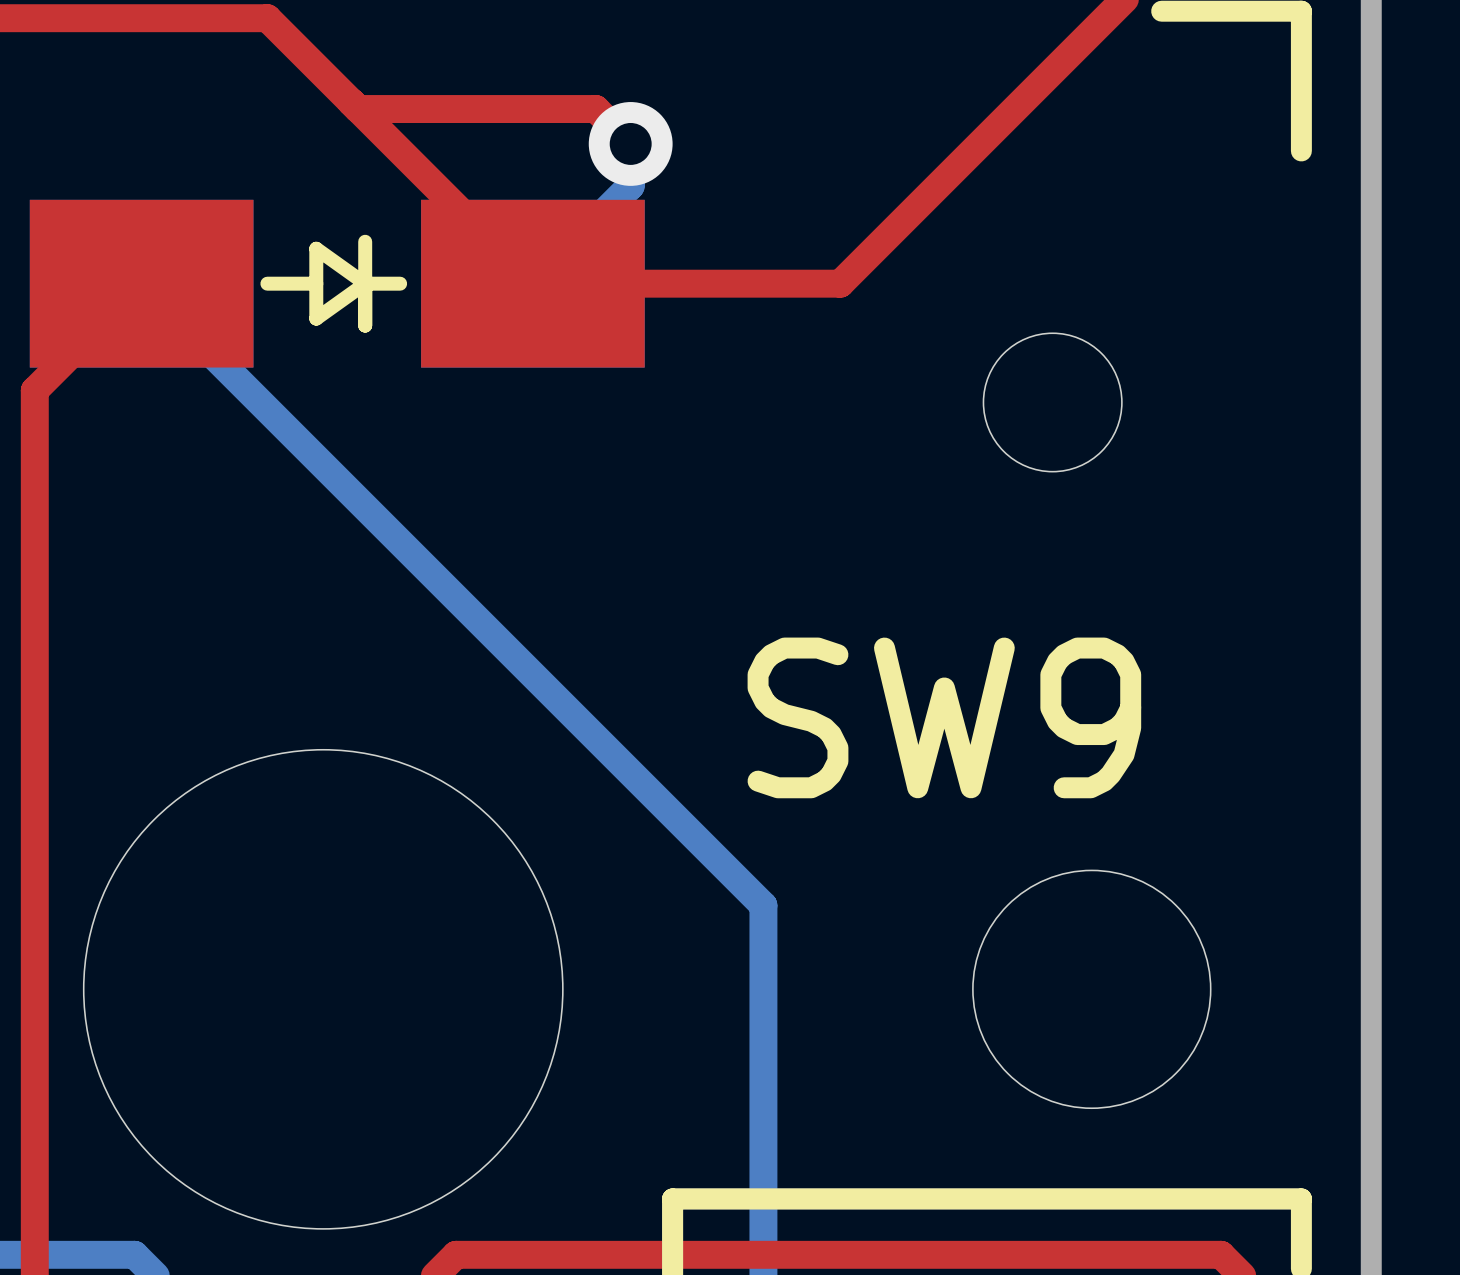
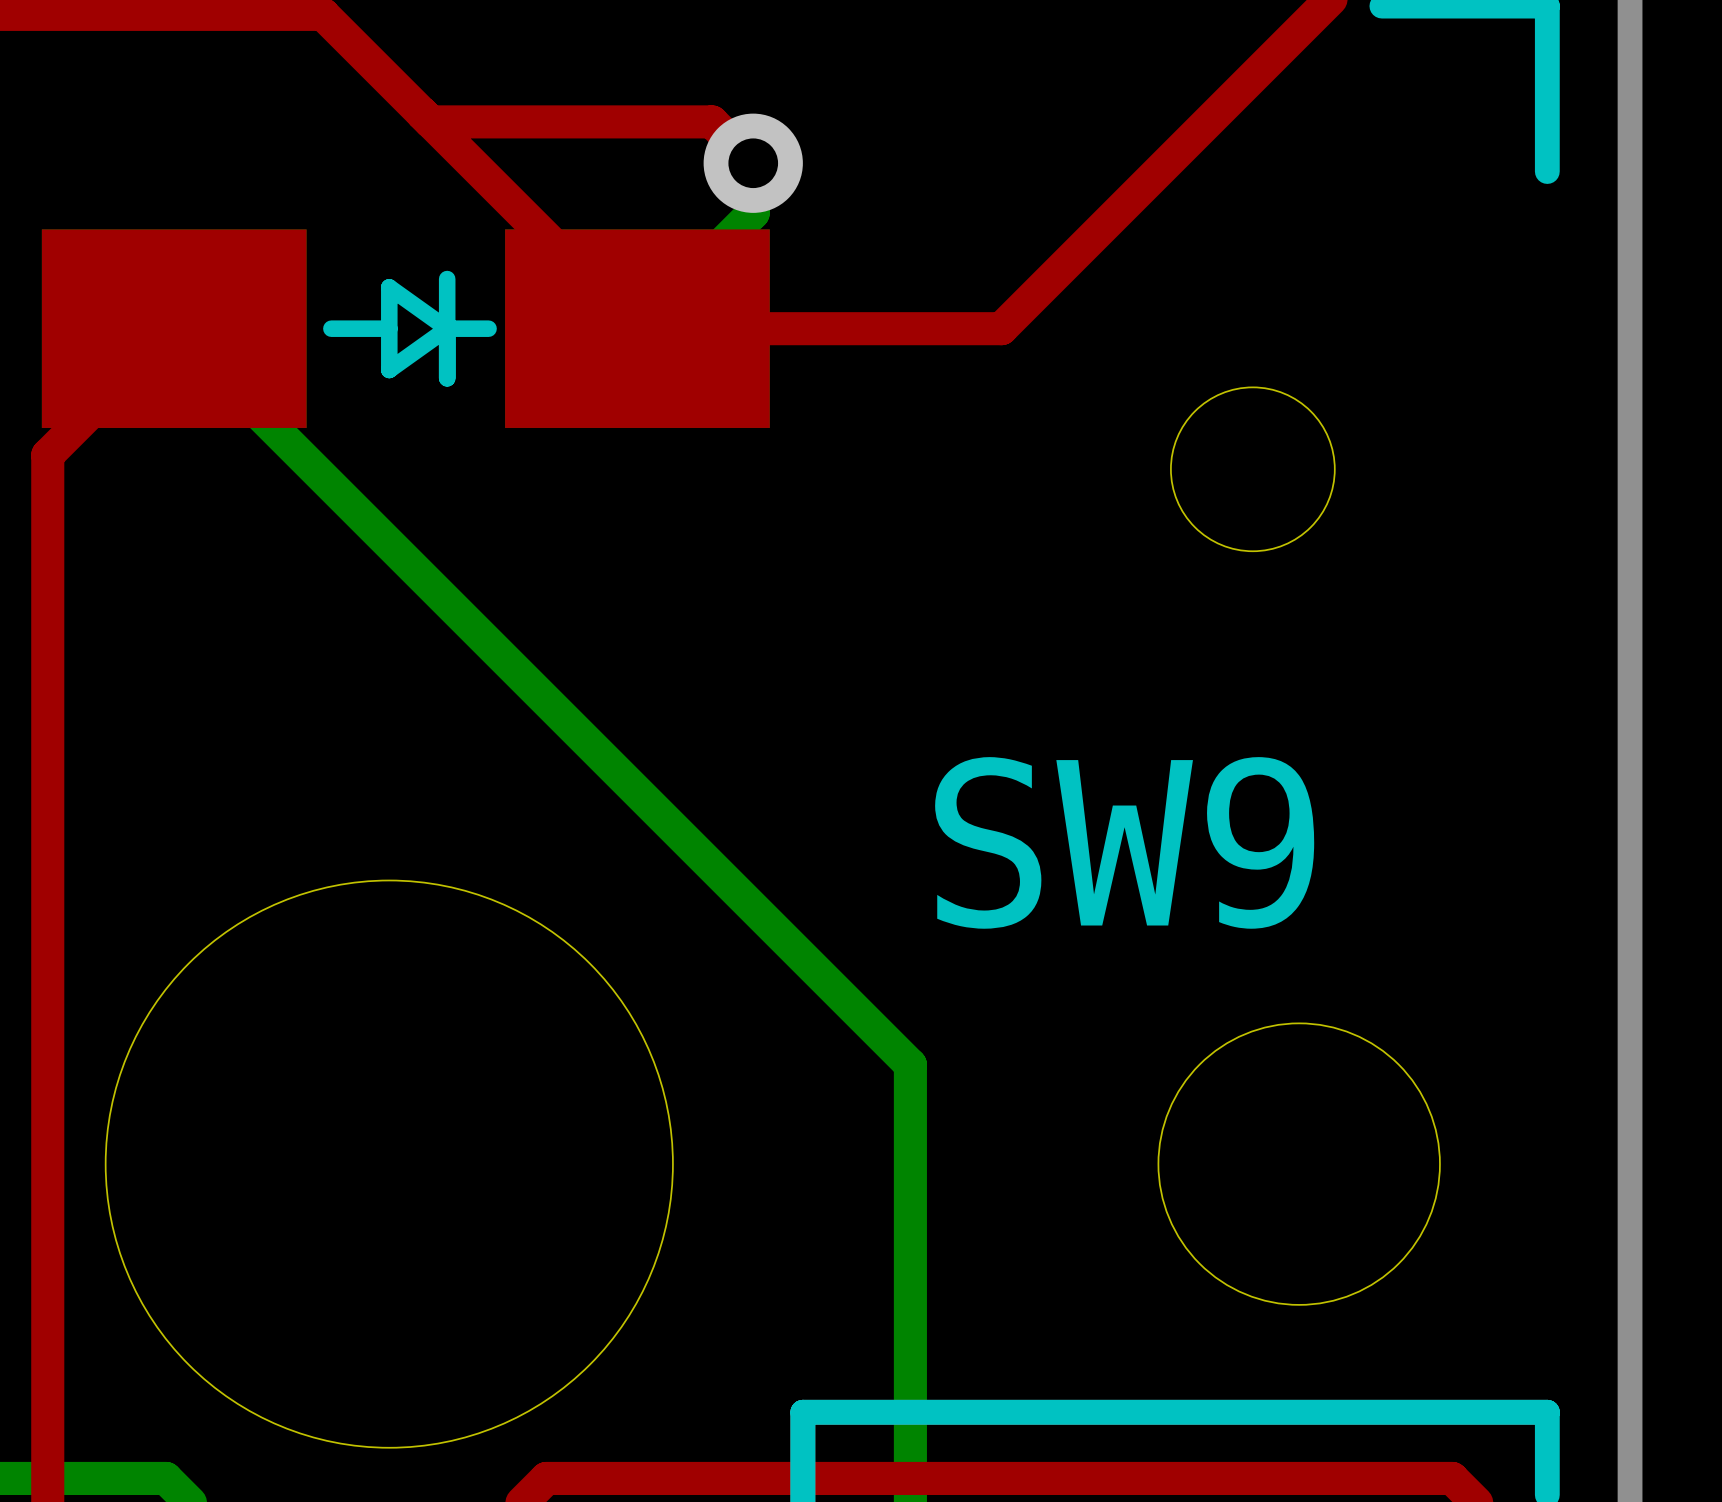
part footprint: [29, 199, 645, 368] -> [41, 229, 770, 428]

